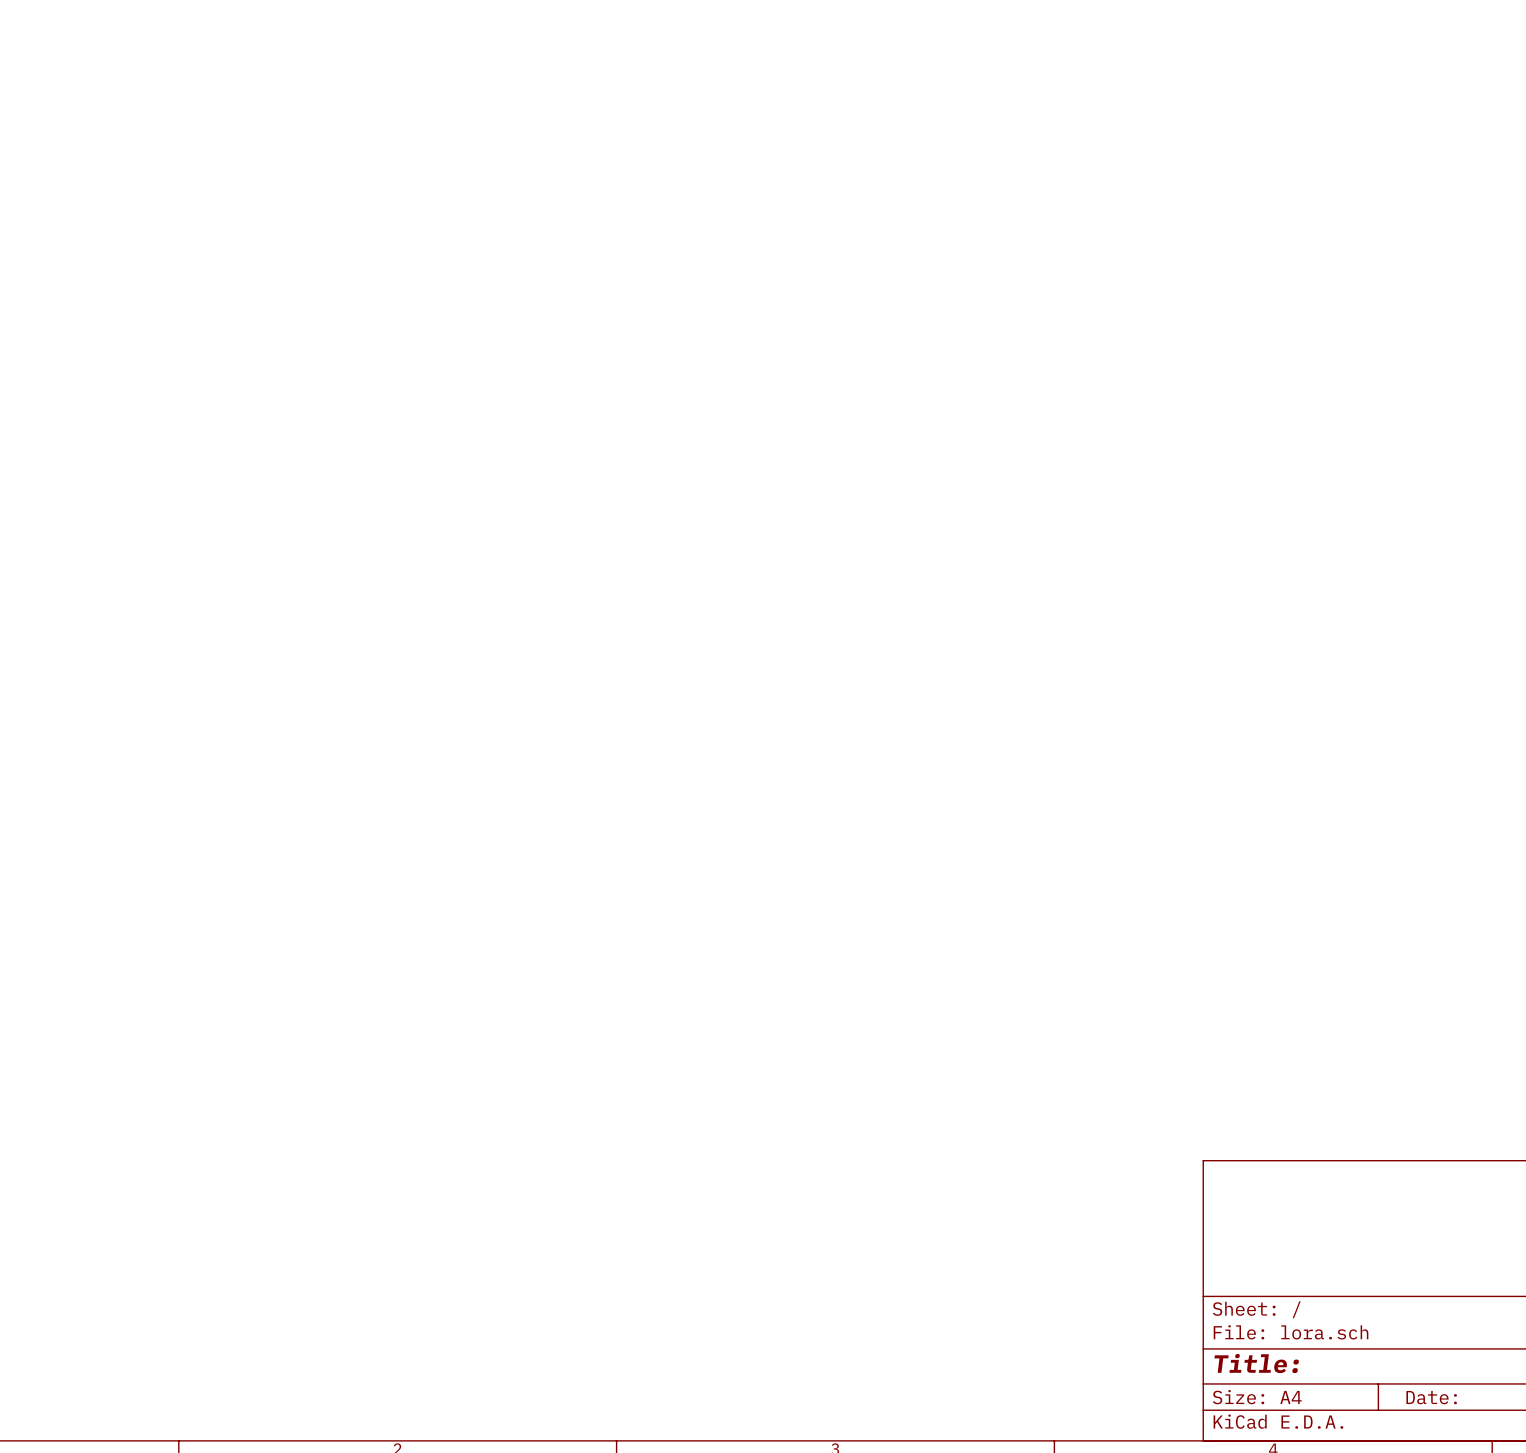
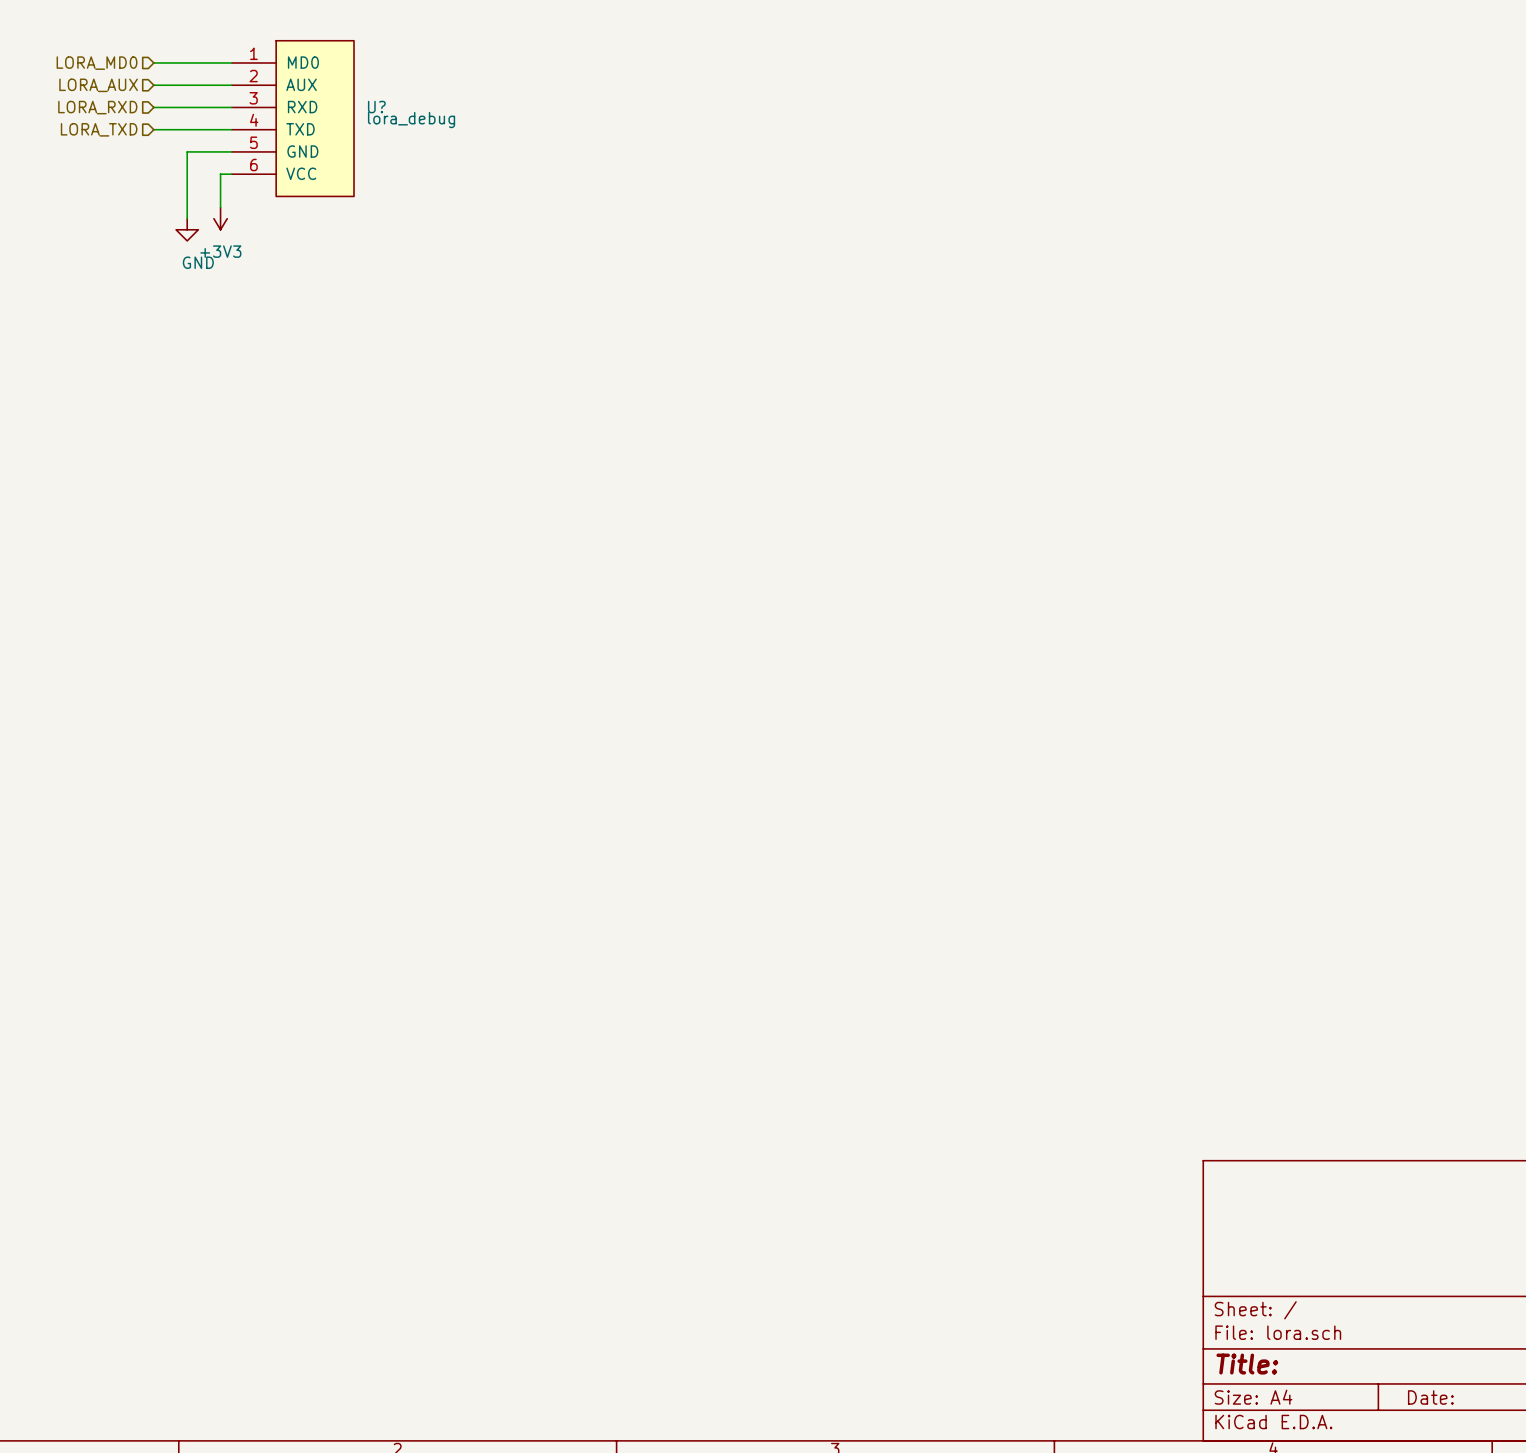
wire: none -> (153, 62) (231, 62)
hierarchical label: none -> LORA_MD0 (97, 63)
wire: none -> (153, 85) (231, 85)
hierarchical label: none -> LORA_AUX (98, 85)
wire: none -> (153, 107) (231, 107)
hierarchical label: none -> LORA_RXD (97, 107)
U?: none -> lora_debug (292, 118)
wire: none -> (153, 129) (231, 129)
hierarchical label: none -> LORA_TXD (99, 129)
wire: none -> (231, 151) (187, 151) (187, 218)
wire: none -> (231, 174) (220, 174) (220, 207)
power symbol: none -> +3V3 (220, 218)
power symbol: none -> GND (187, 229)

